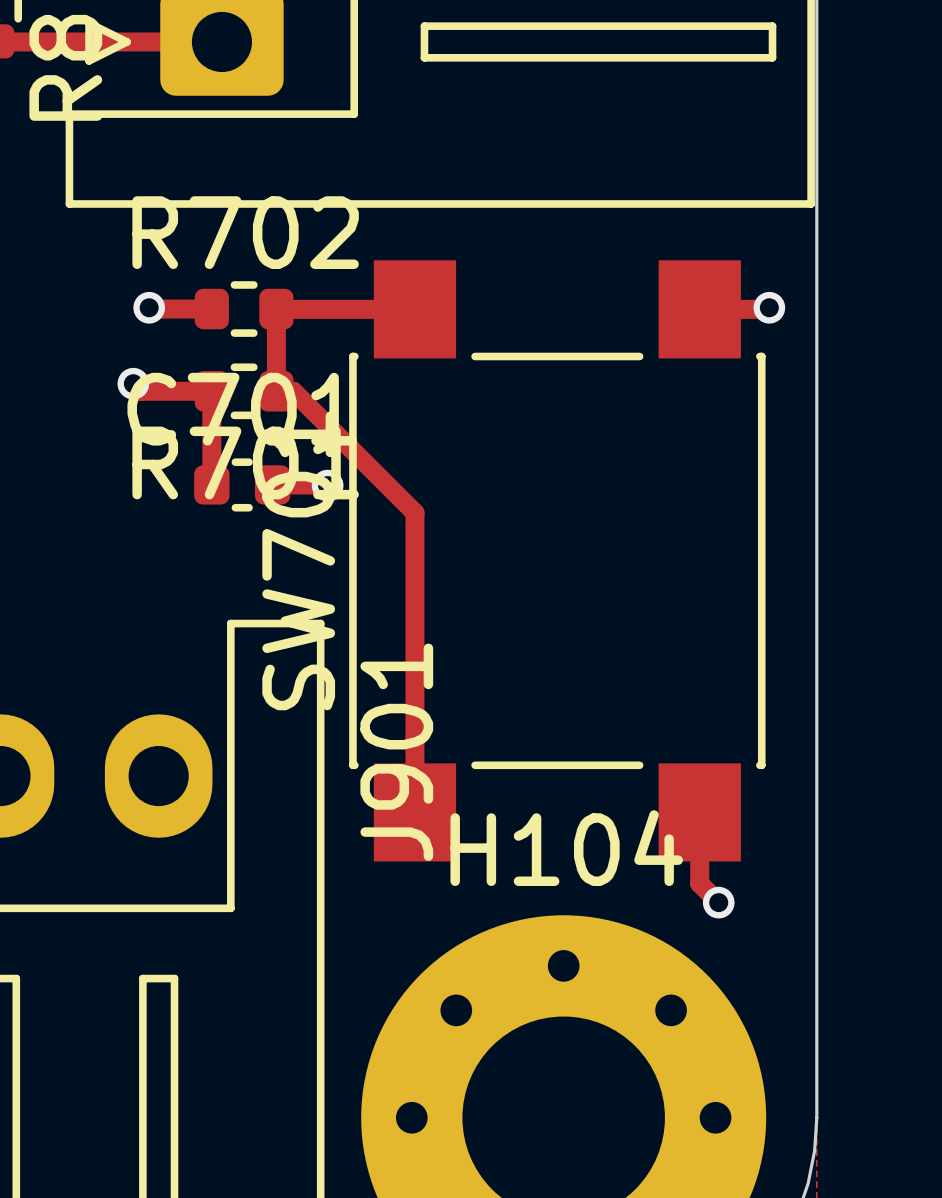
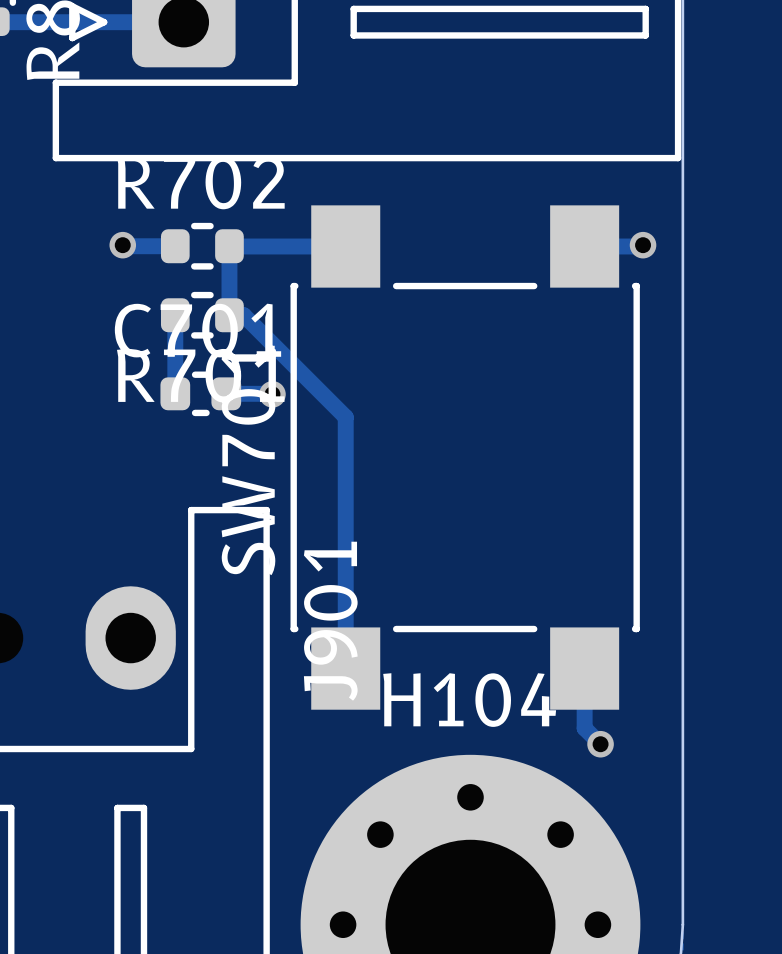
track: (133, 383) (140, 391) (211, 391) -> none
via: (133, 383) -> none

